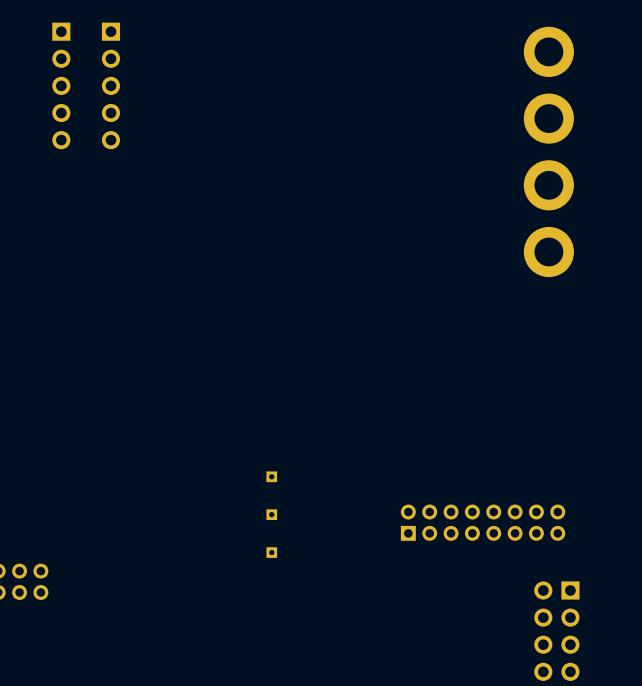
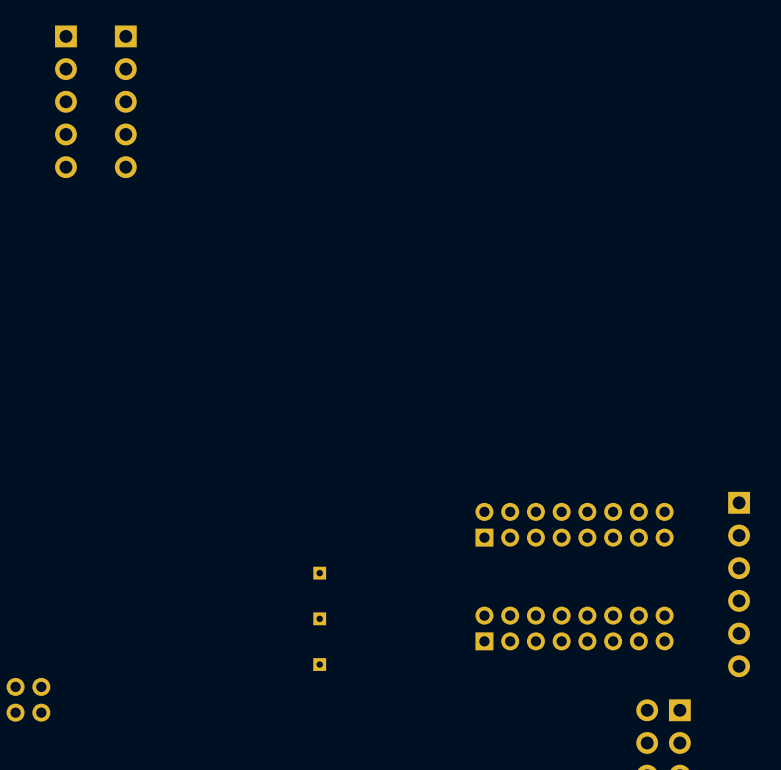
part: (548, 51) -> none
part: (548, 118) -> none
part: (548, 185) -> none
part: (548, 252) -> none
part: none -> (574, 524)
part: none -> (739, 584)

